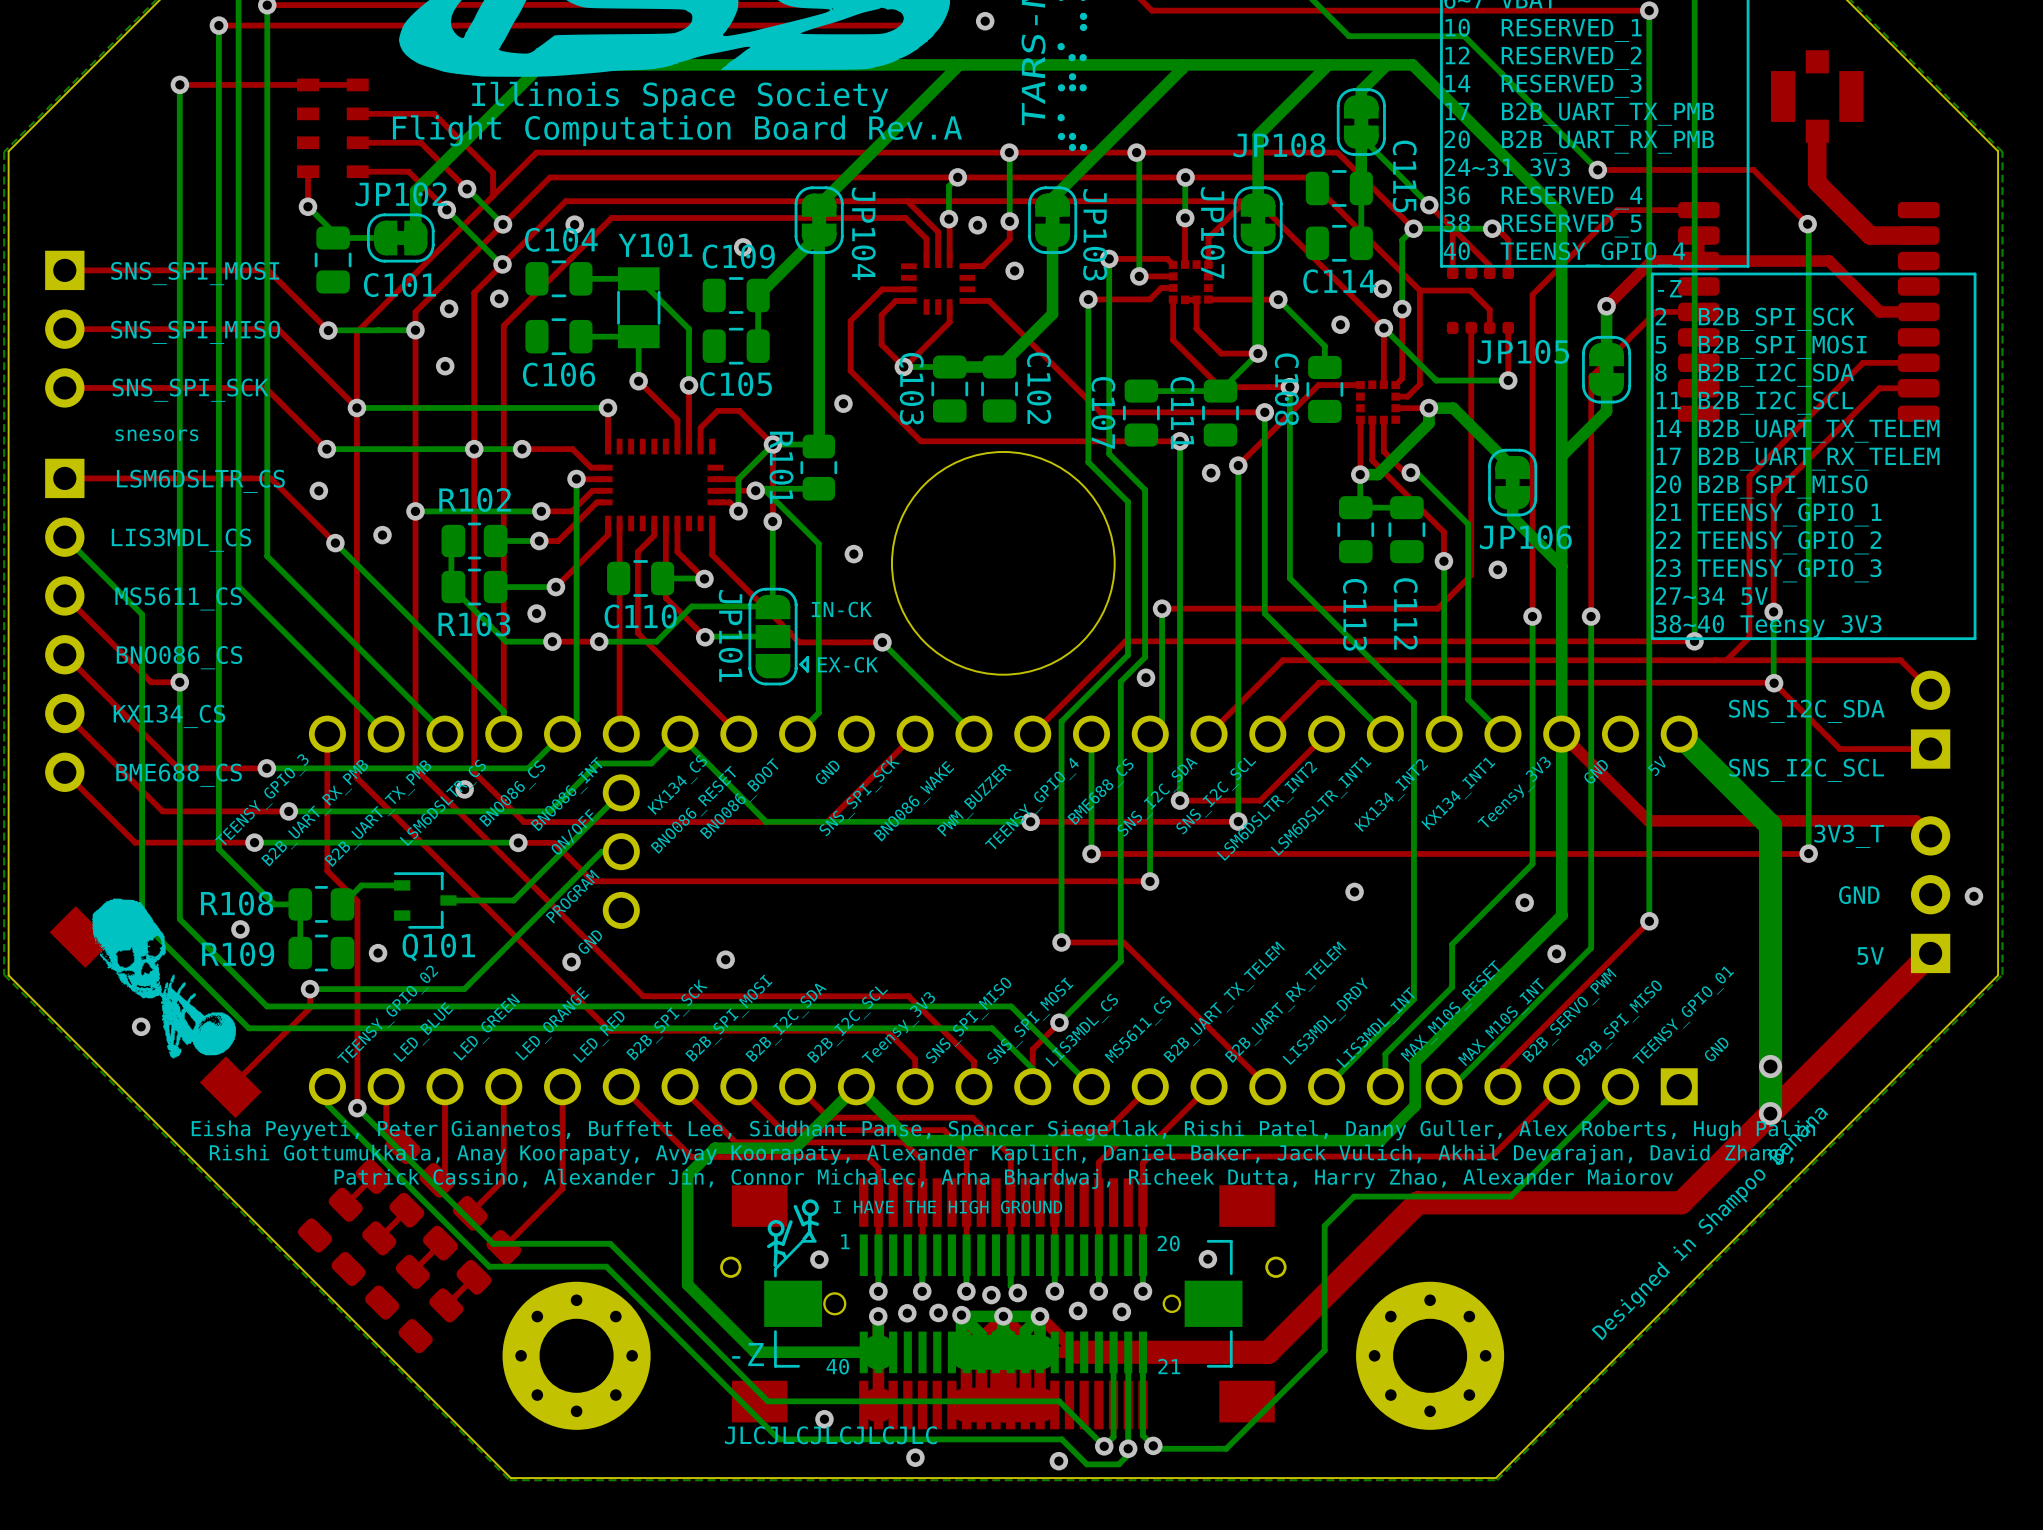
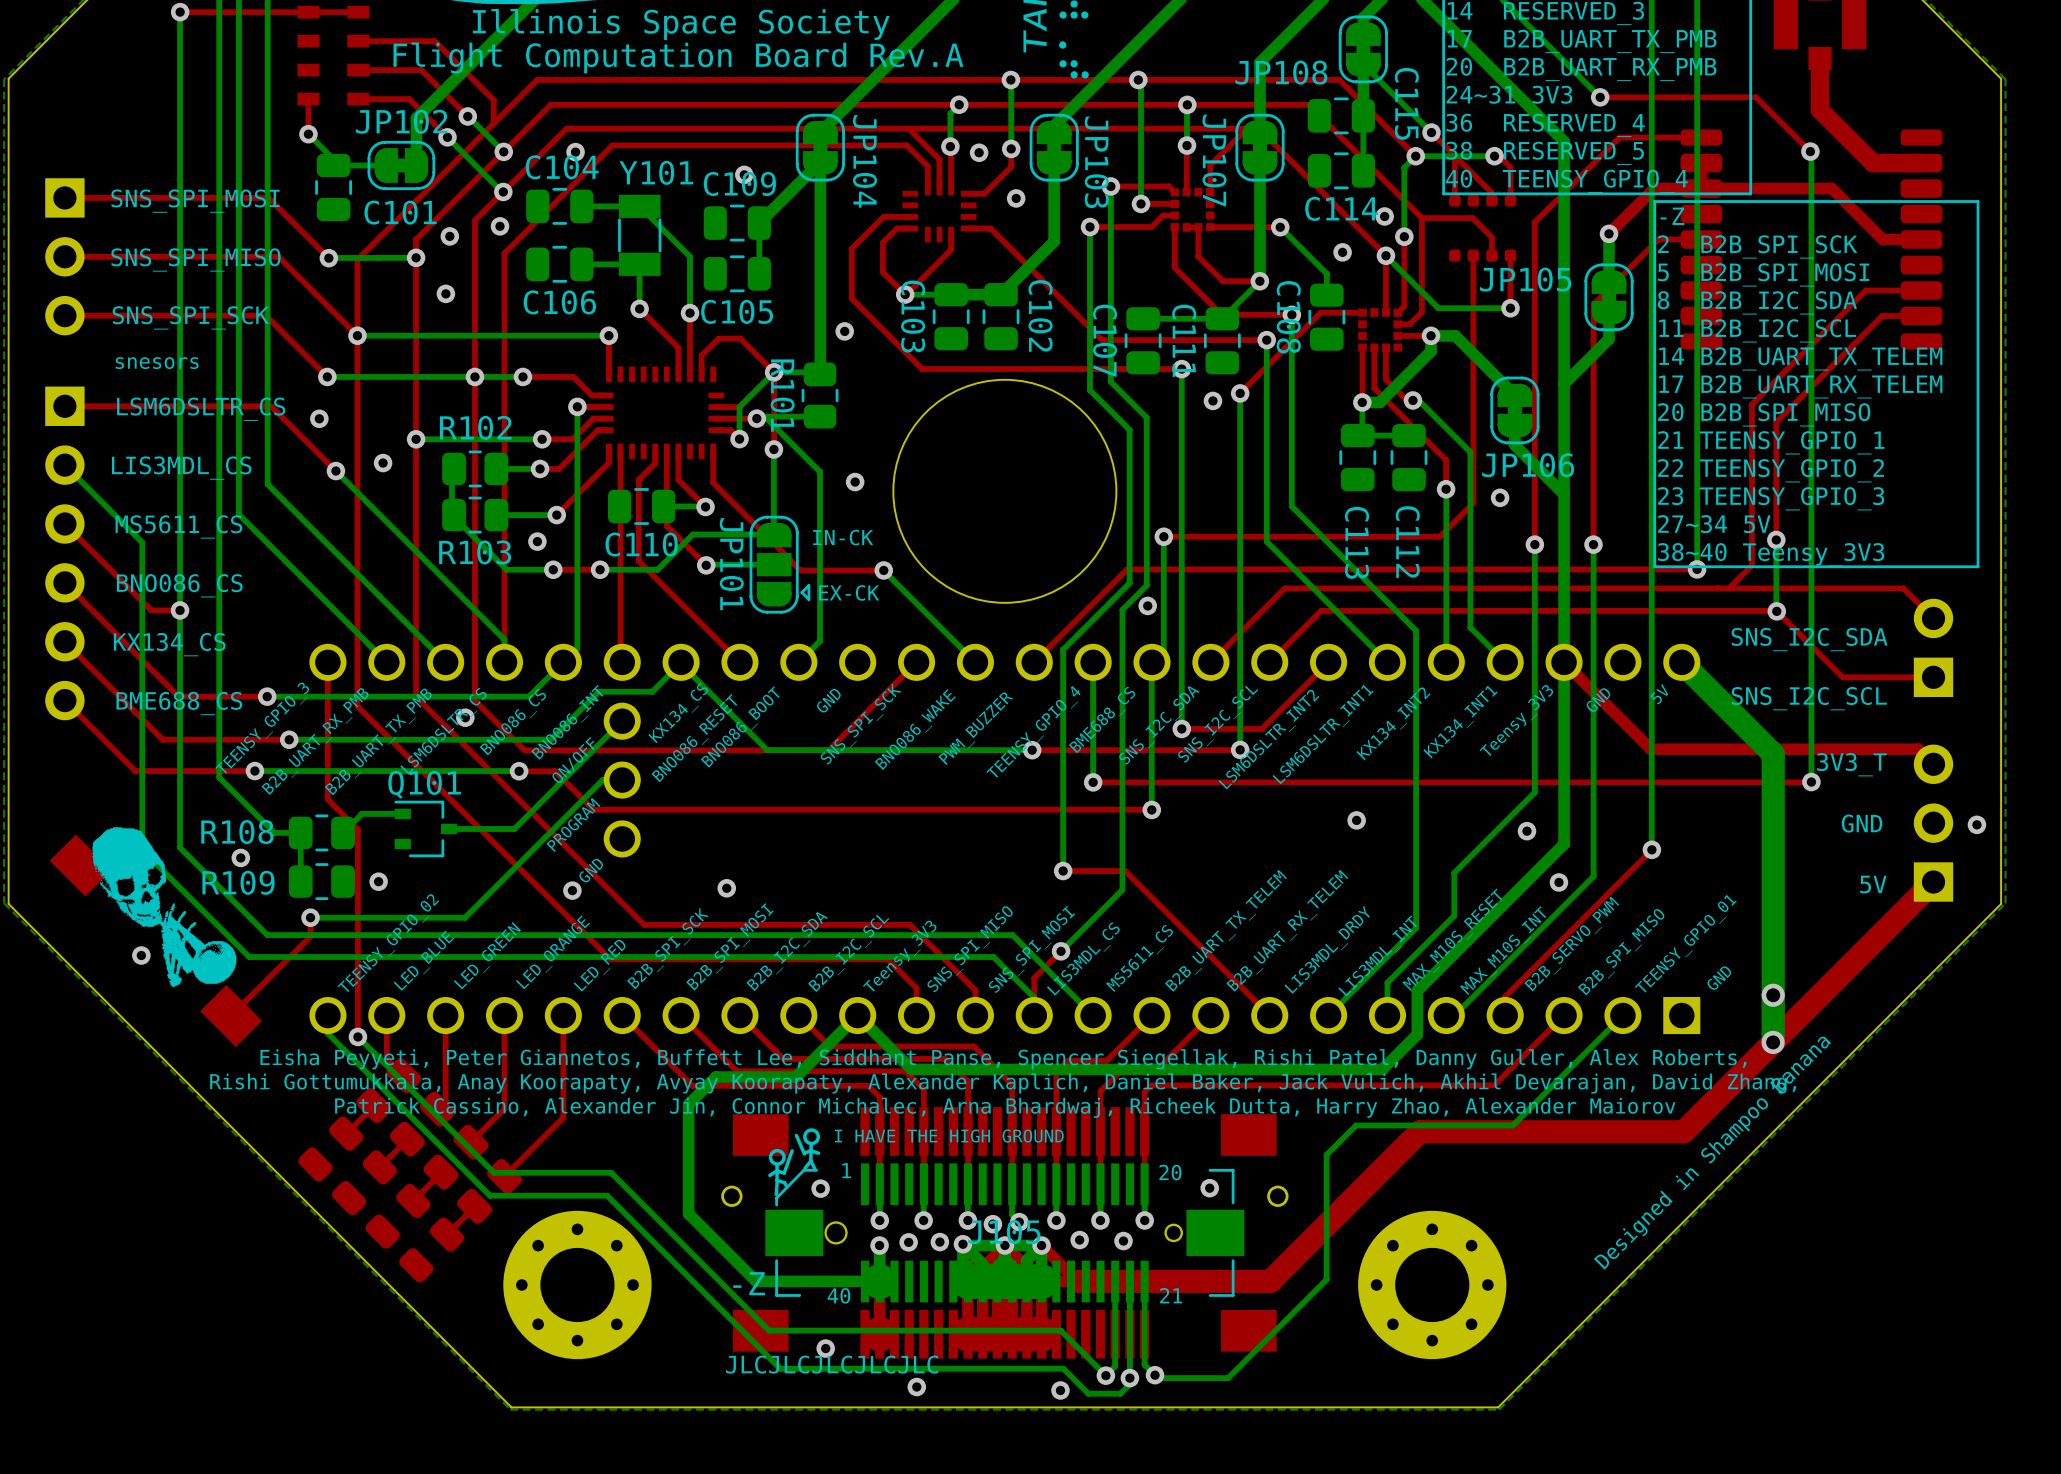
Q101 name position: Q101 (438, 947) -> Q101 (424, 784)
text: Eisha Peyyeti, Peter Giannetos, Buffett Lee, Siddhant Panse, Spencer Siegellak, Rishi Patel, Danny Guller, Alex Roberts, Hugh Palin (1003, 1130) -> Eisha Peyyeti, Peter Giannetos, Buffett Lee, Siddhant Panse, Spencer Siegellak, Rishi Patel, Danny Guller, Alex Roberts, (1003, 1059)
J105 name: none -> J105 (1004, 1232)

